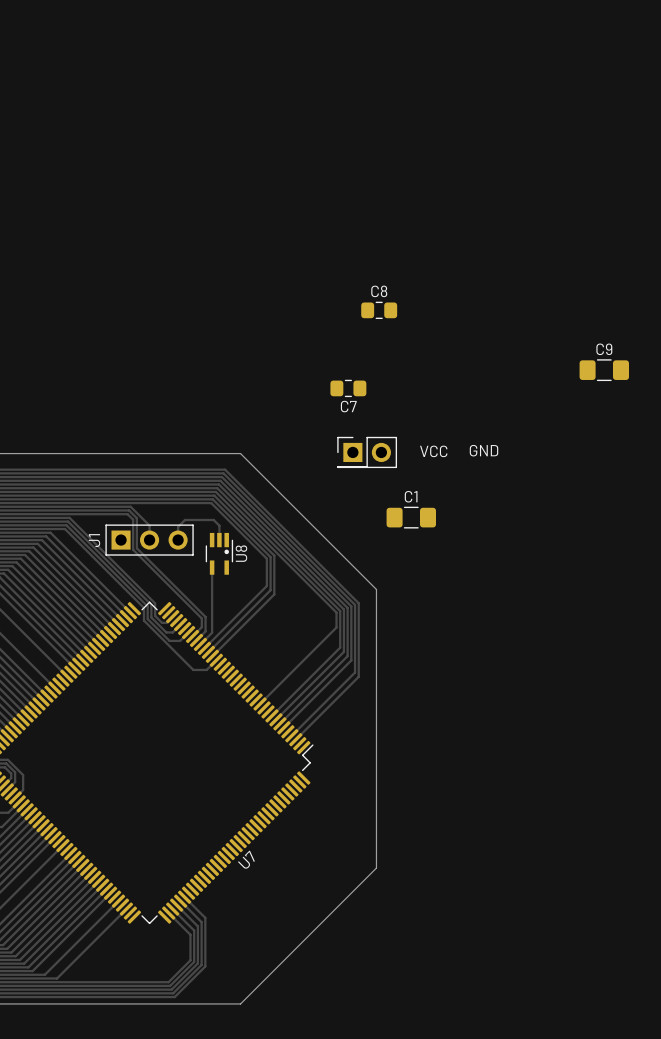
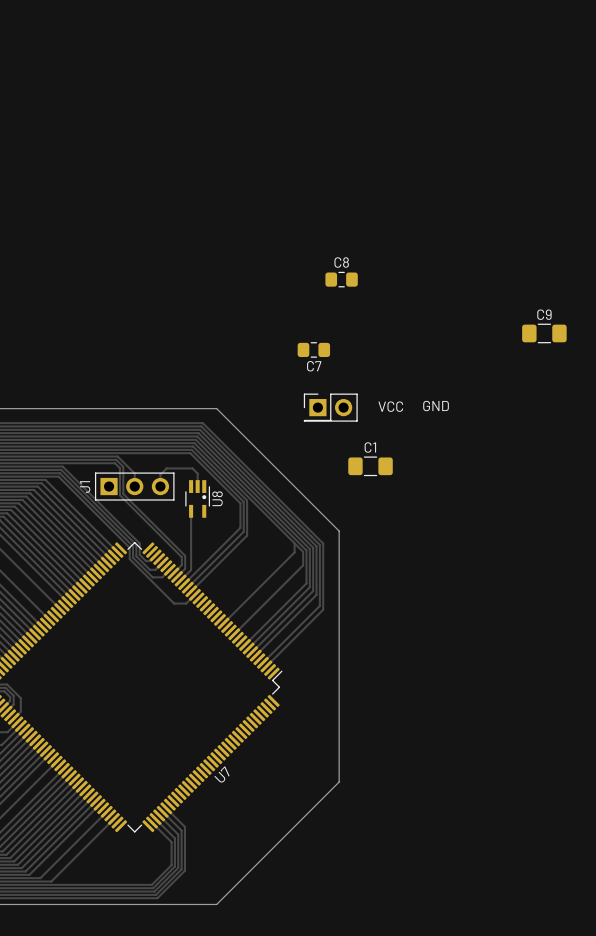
track: none -> (294, 543) (294, 552) (223, 623)

